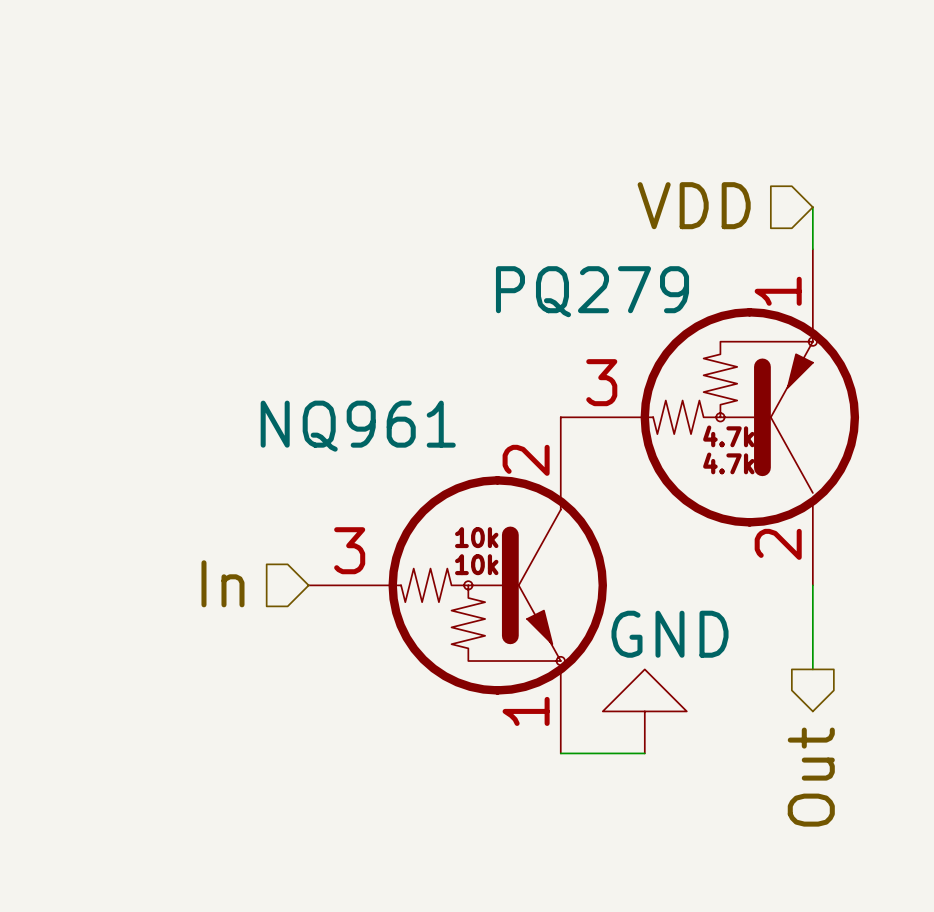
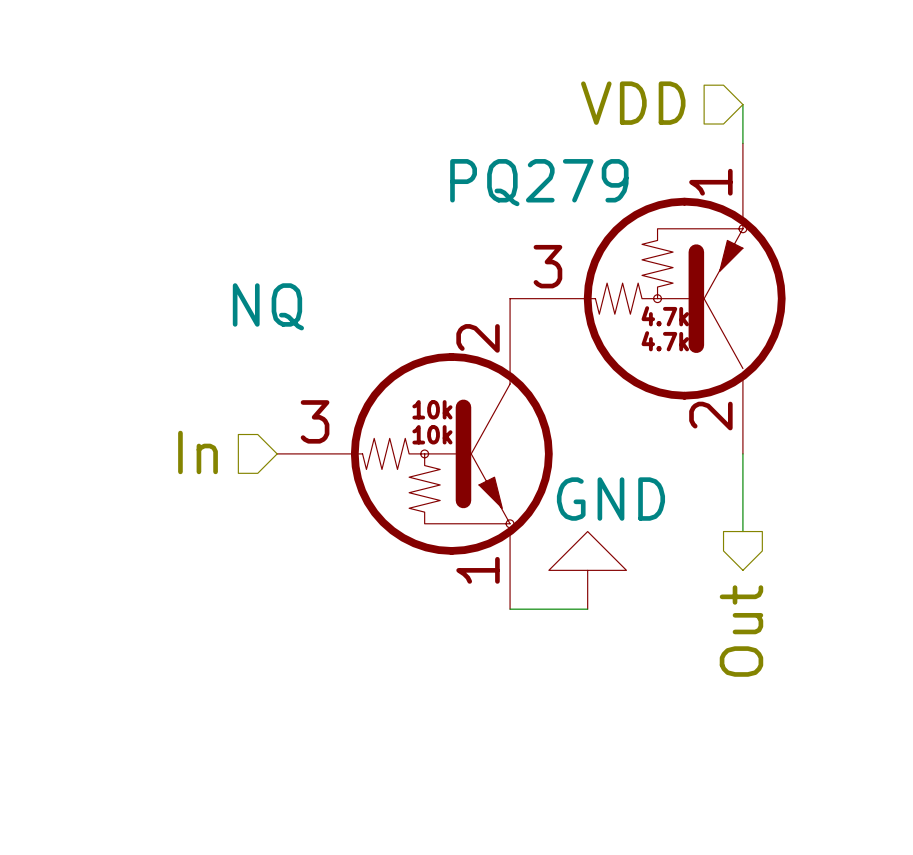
NQ961 name: NQ961 (358, 426) -> NQ (268, 306)

